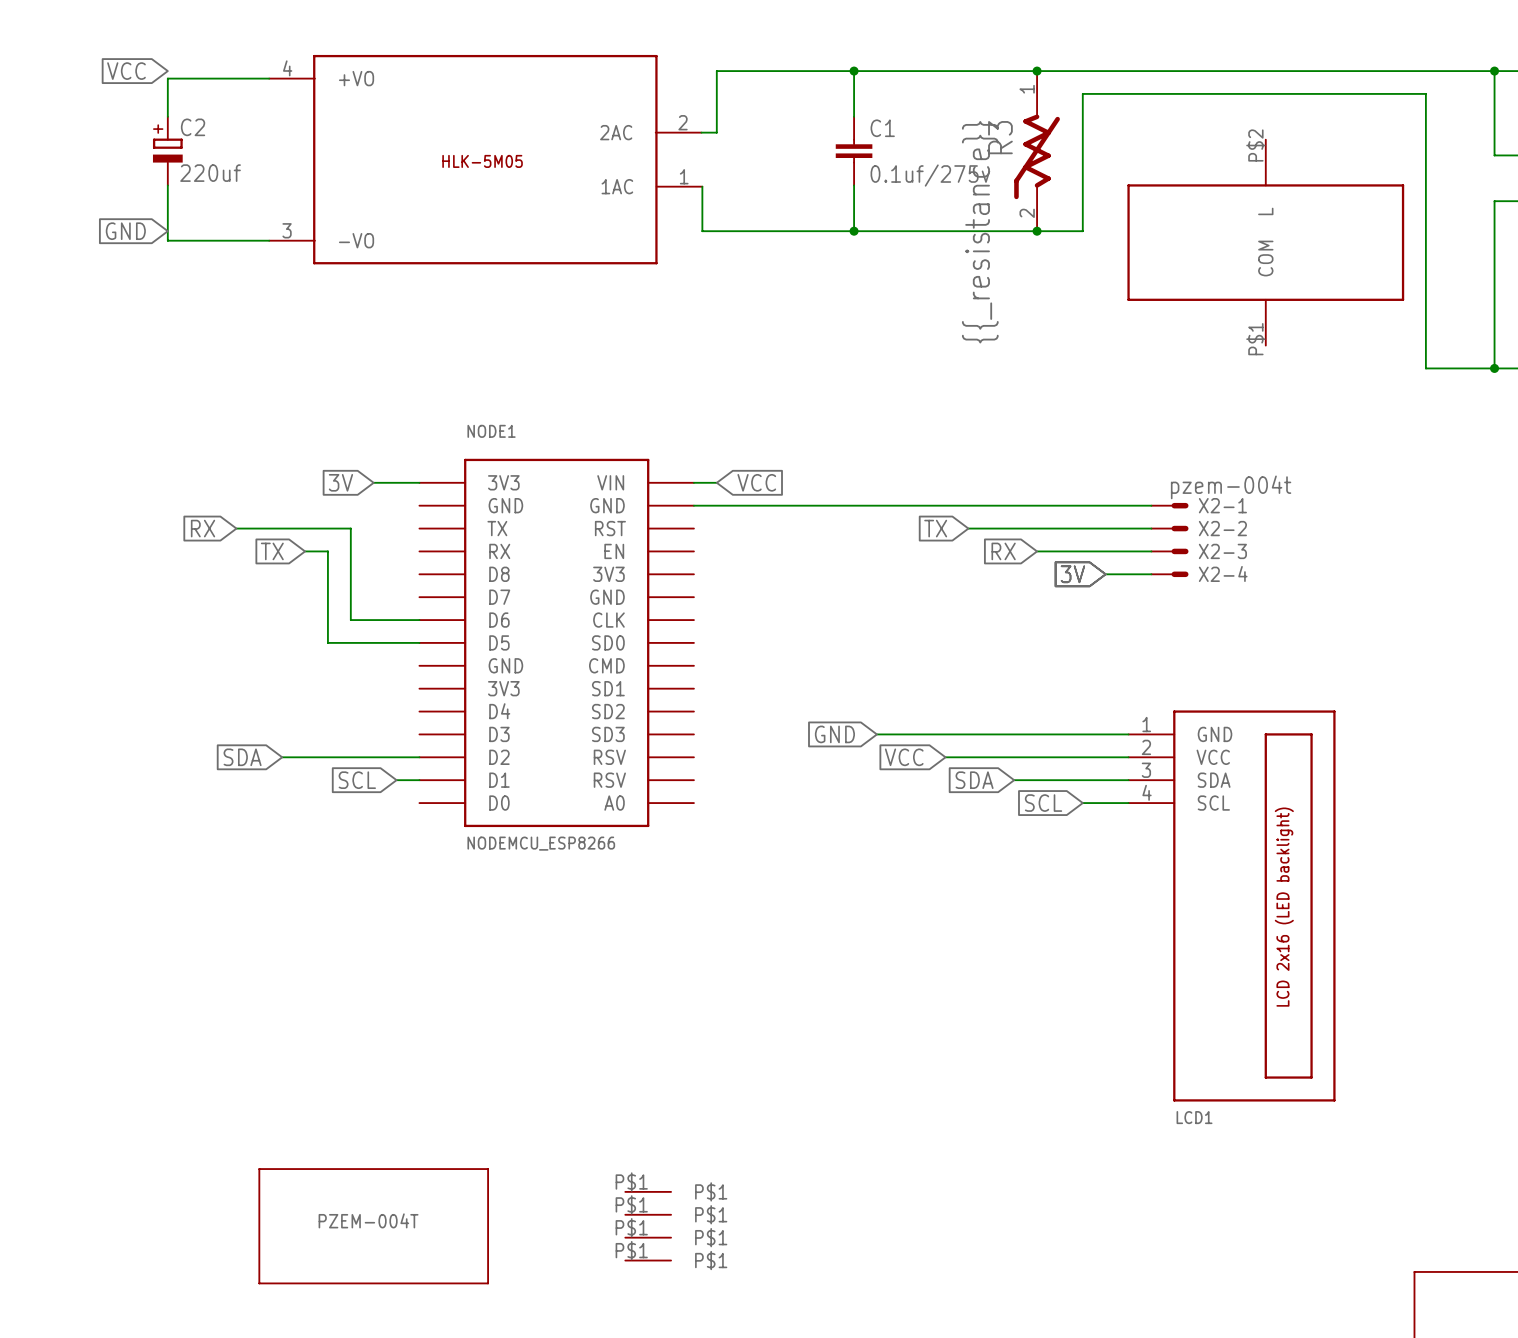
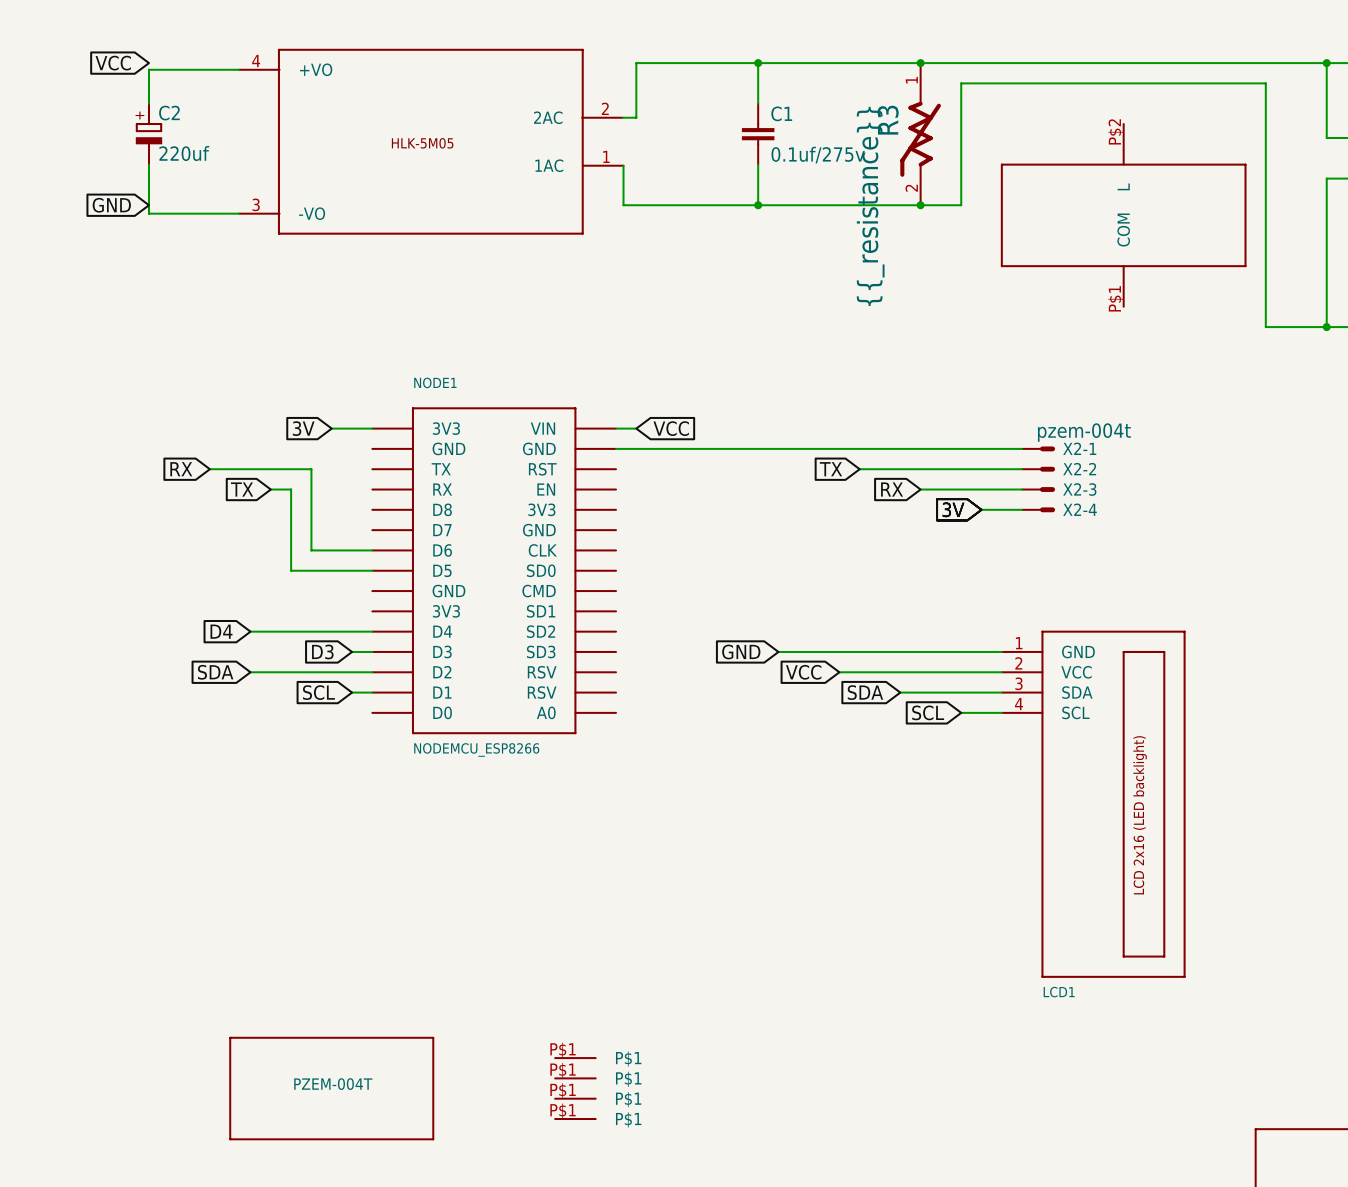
global label: none -> D4 (221, 631)
wire: none -> (250, 631) (372, 631)
global label: none -> D3 (322, 651)
wire: none -> (352, 651) (372, 651)

